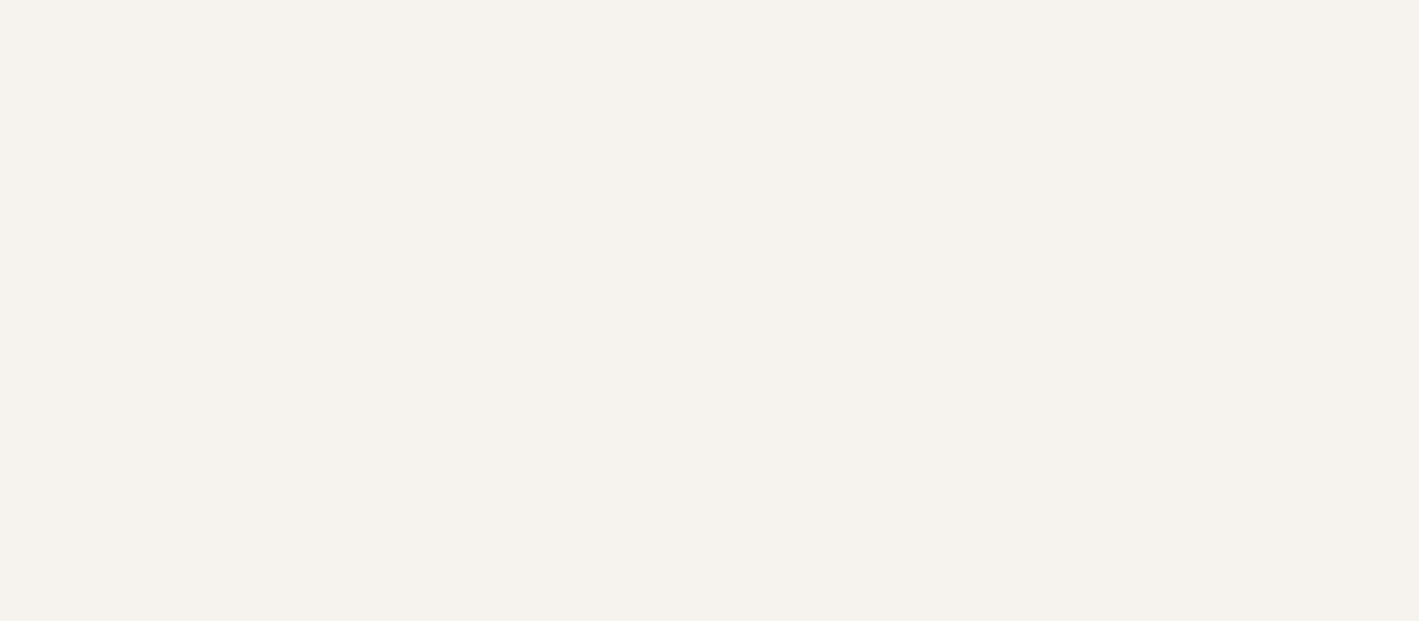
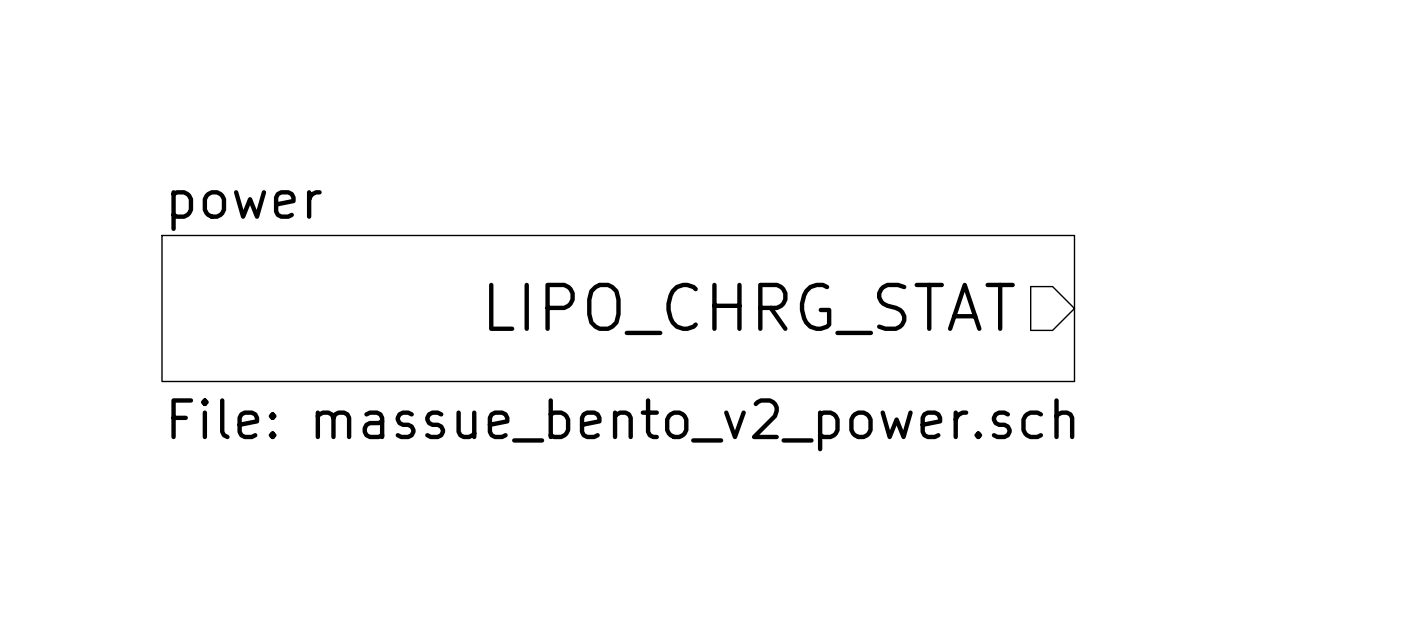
sheet pin: none -> LIPO_CHRG_STAT (751, 308)
sheet power: none -> File: massue_bento_v2_power.sch (618, 308)

